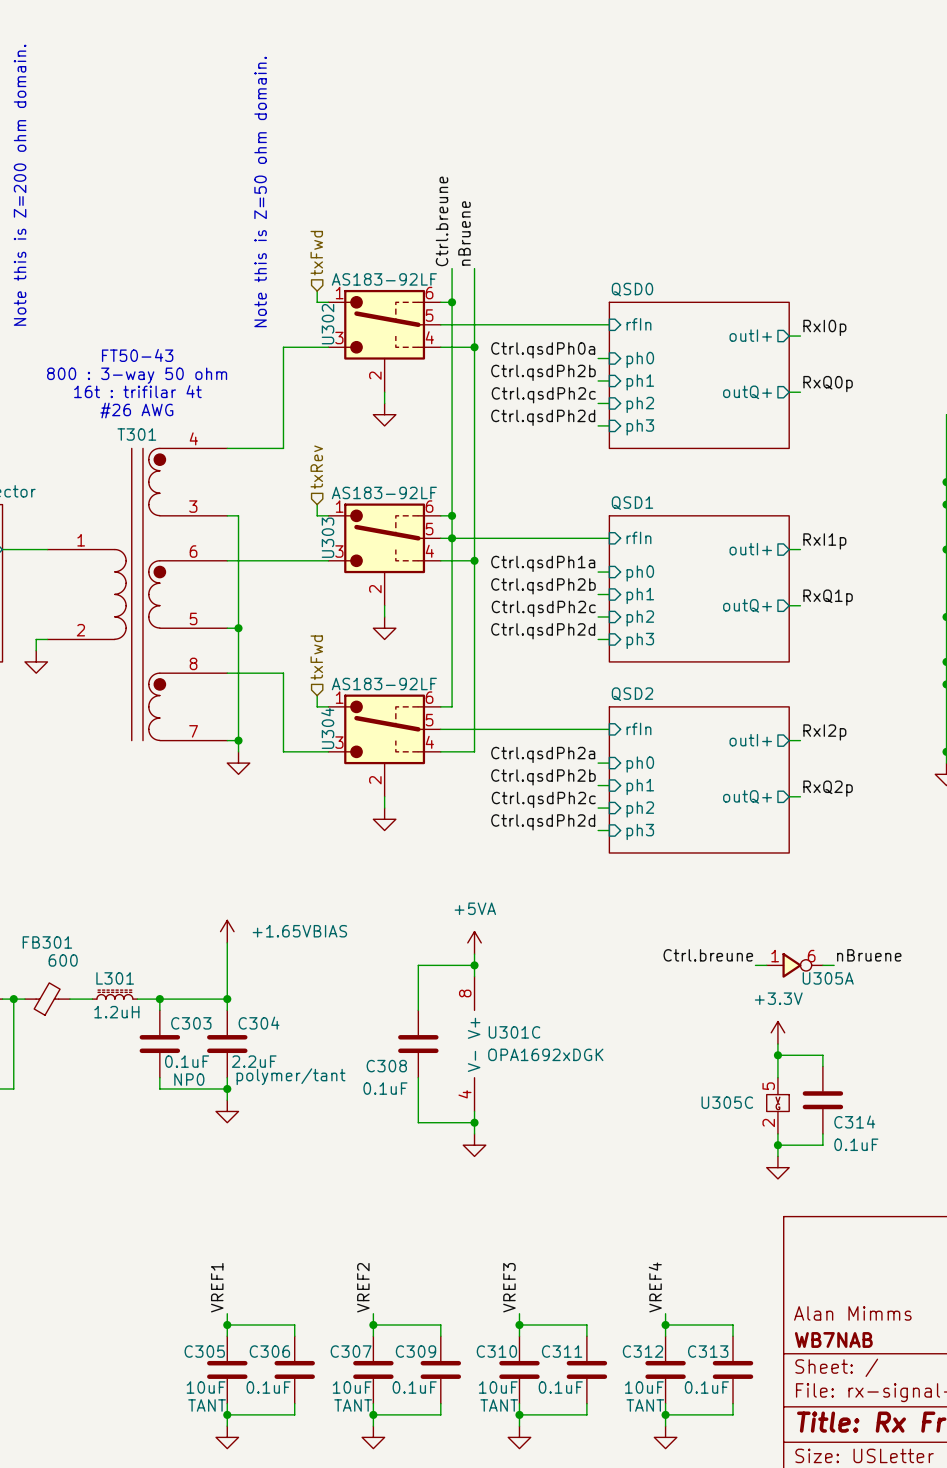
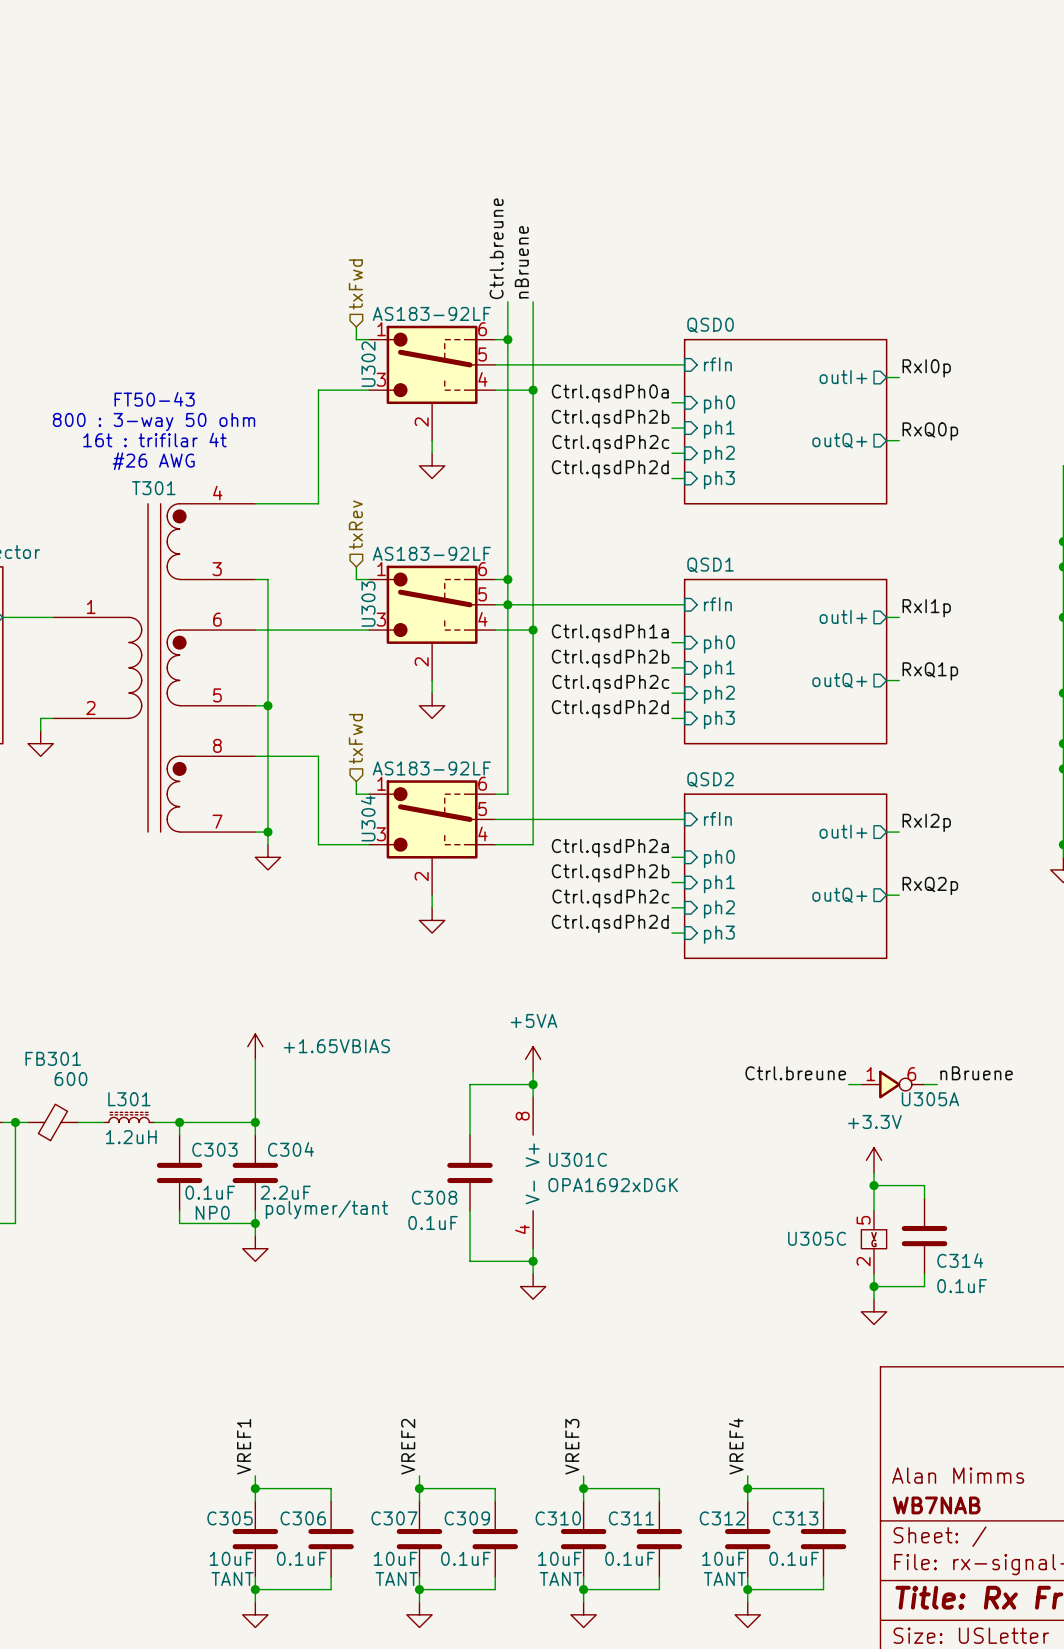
text: Note this is Z=200 ohm domain. (20, 185) -> none
text: Note this is Z=50 ohm domain. (260, 191) -> none

